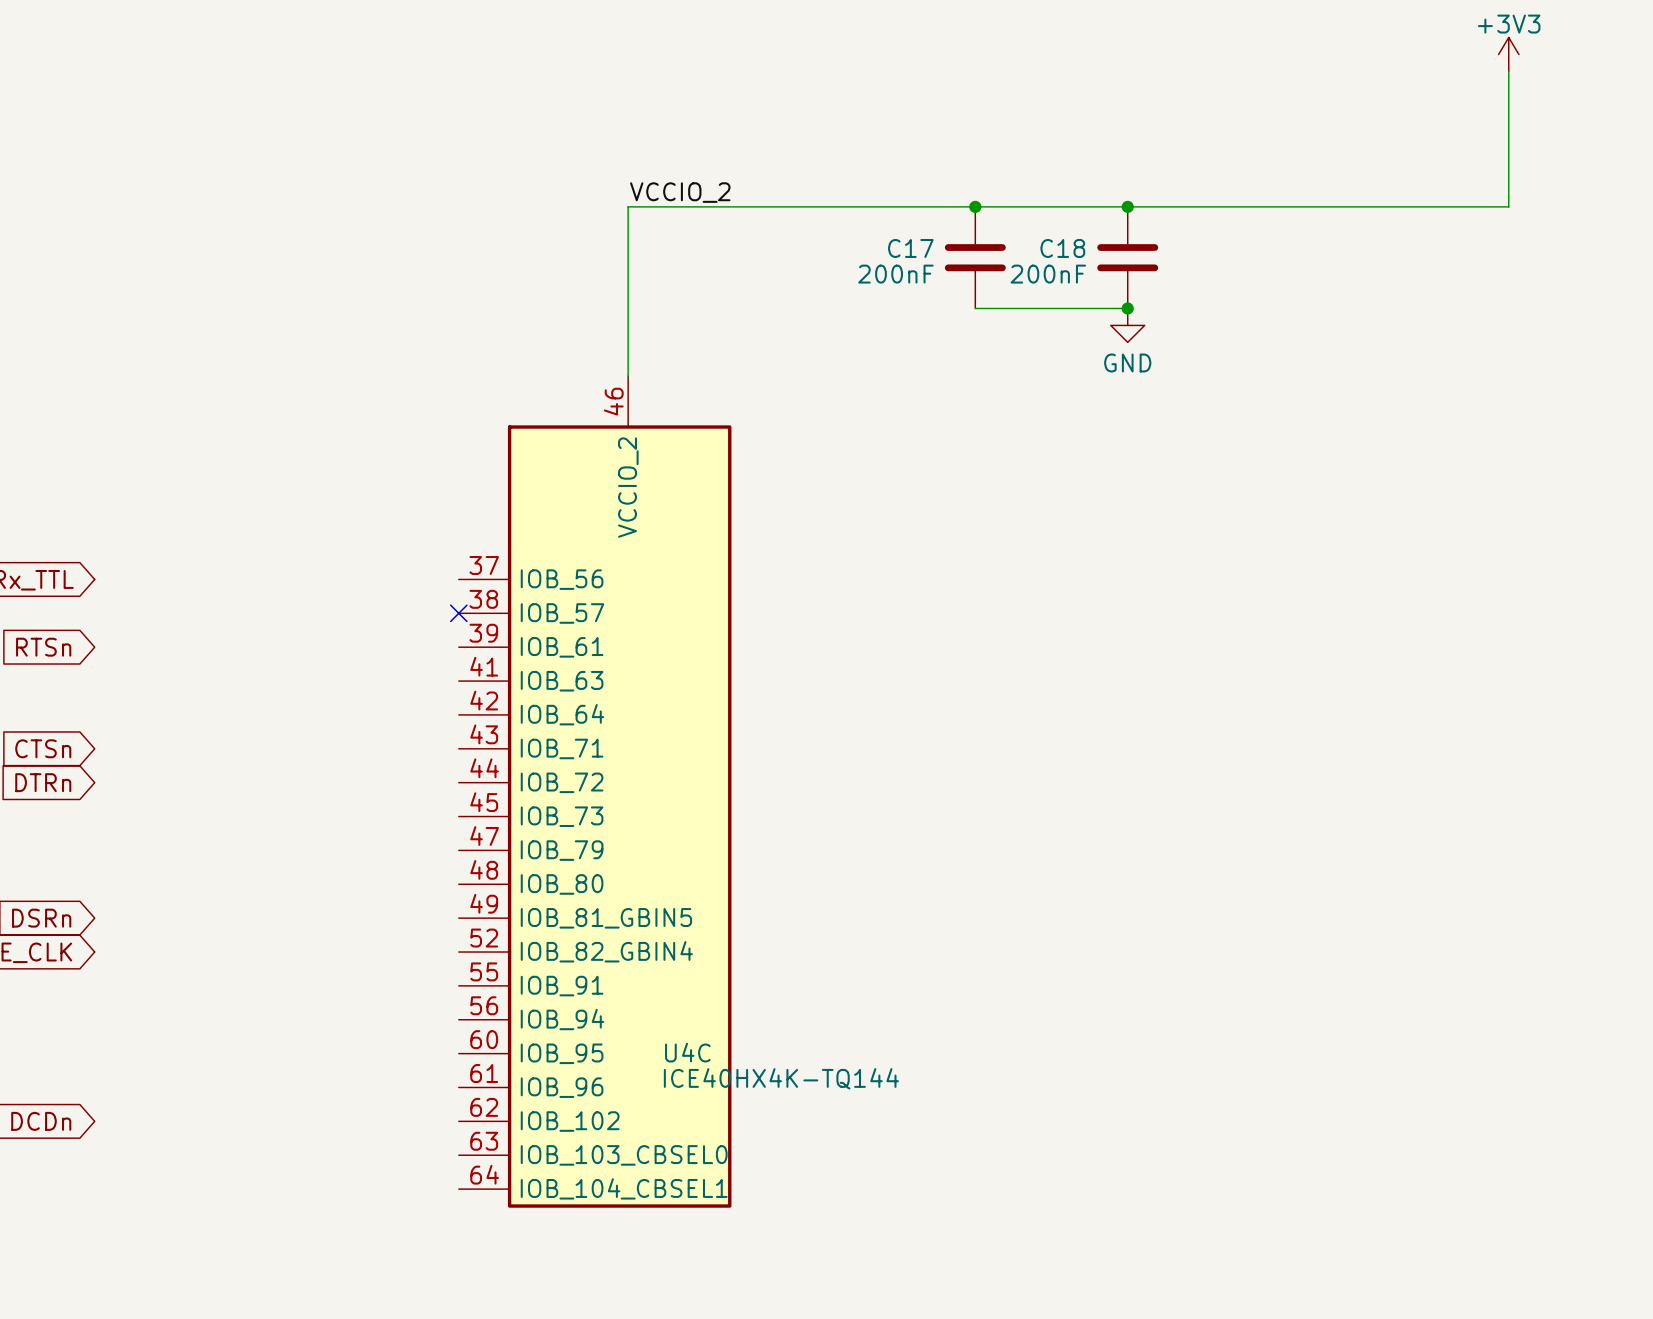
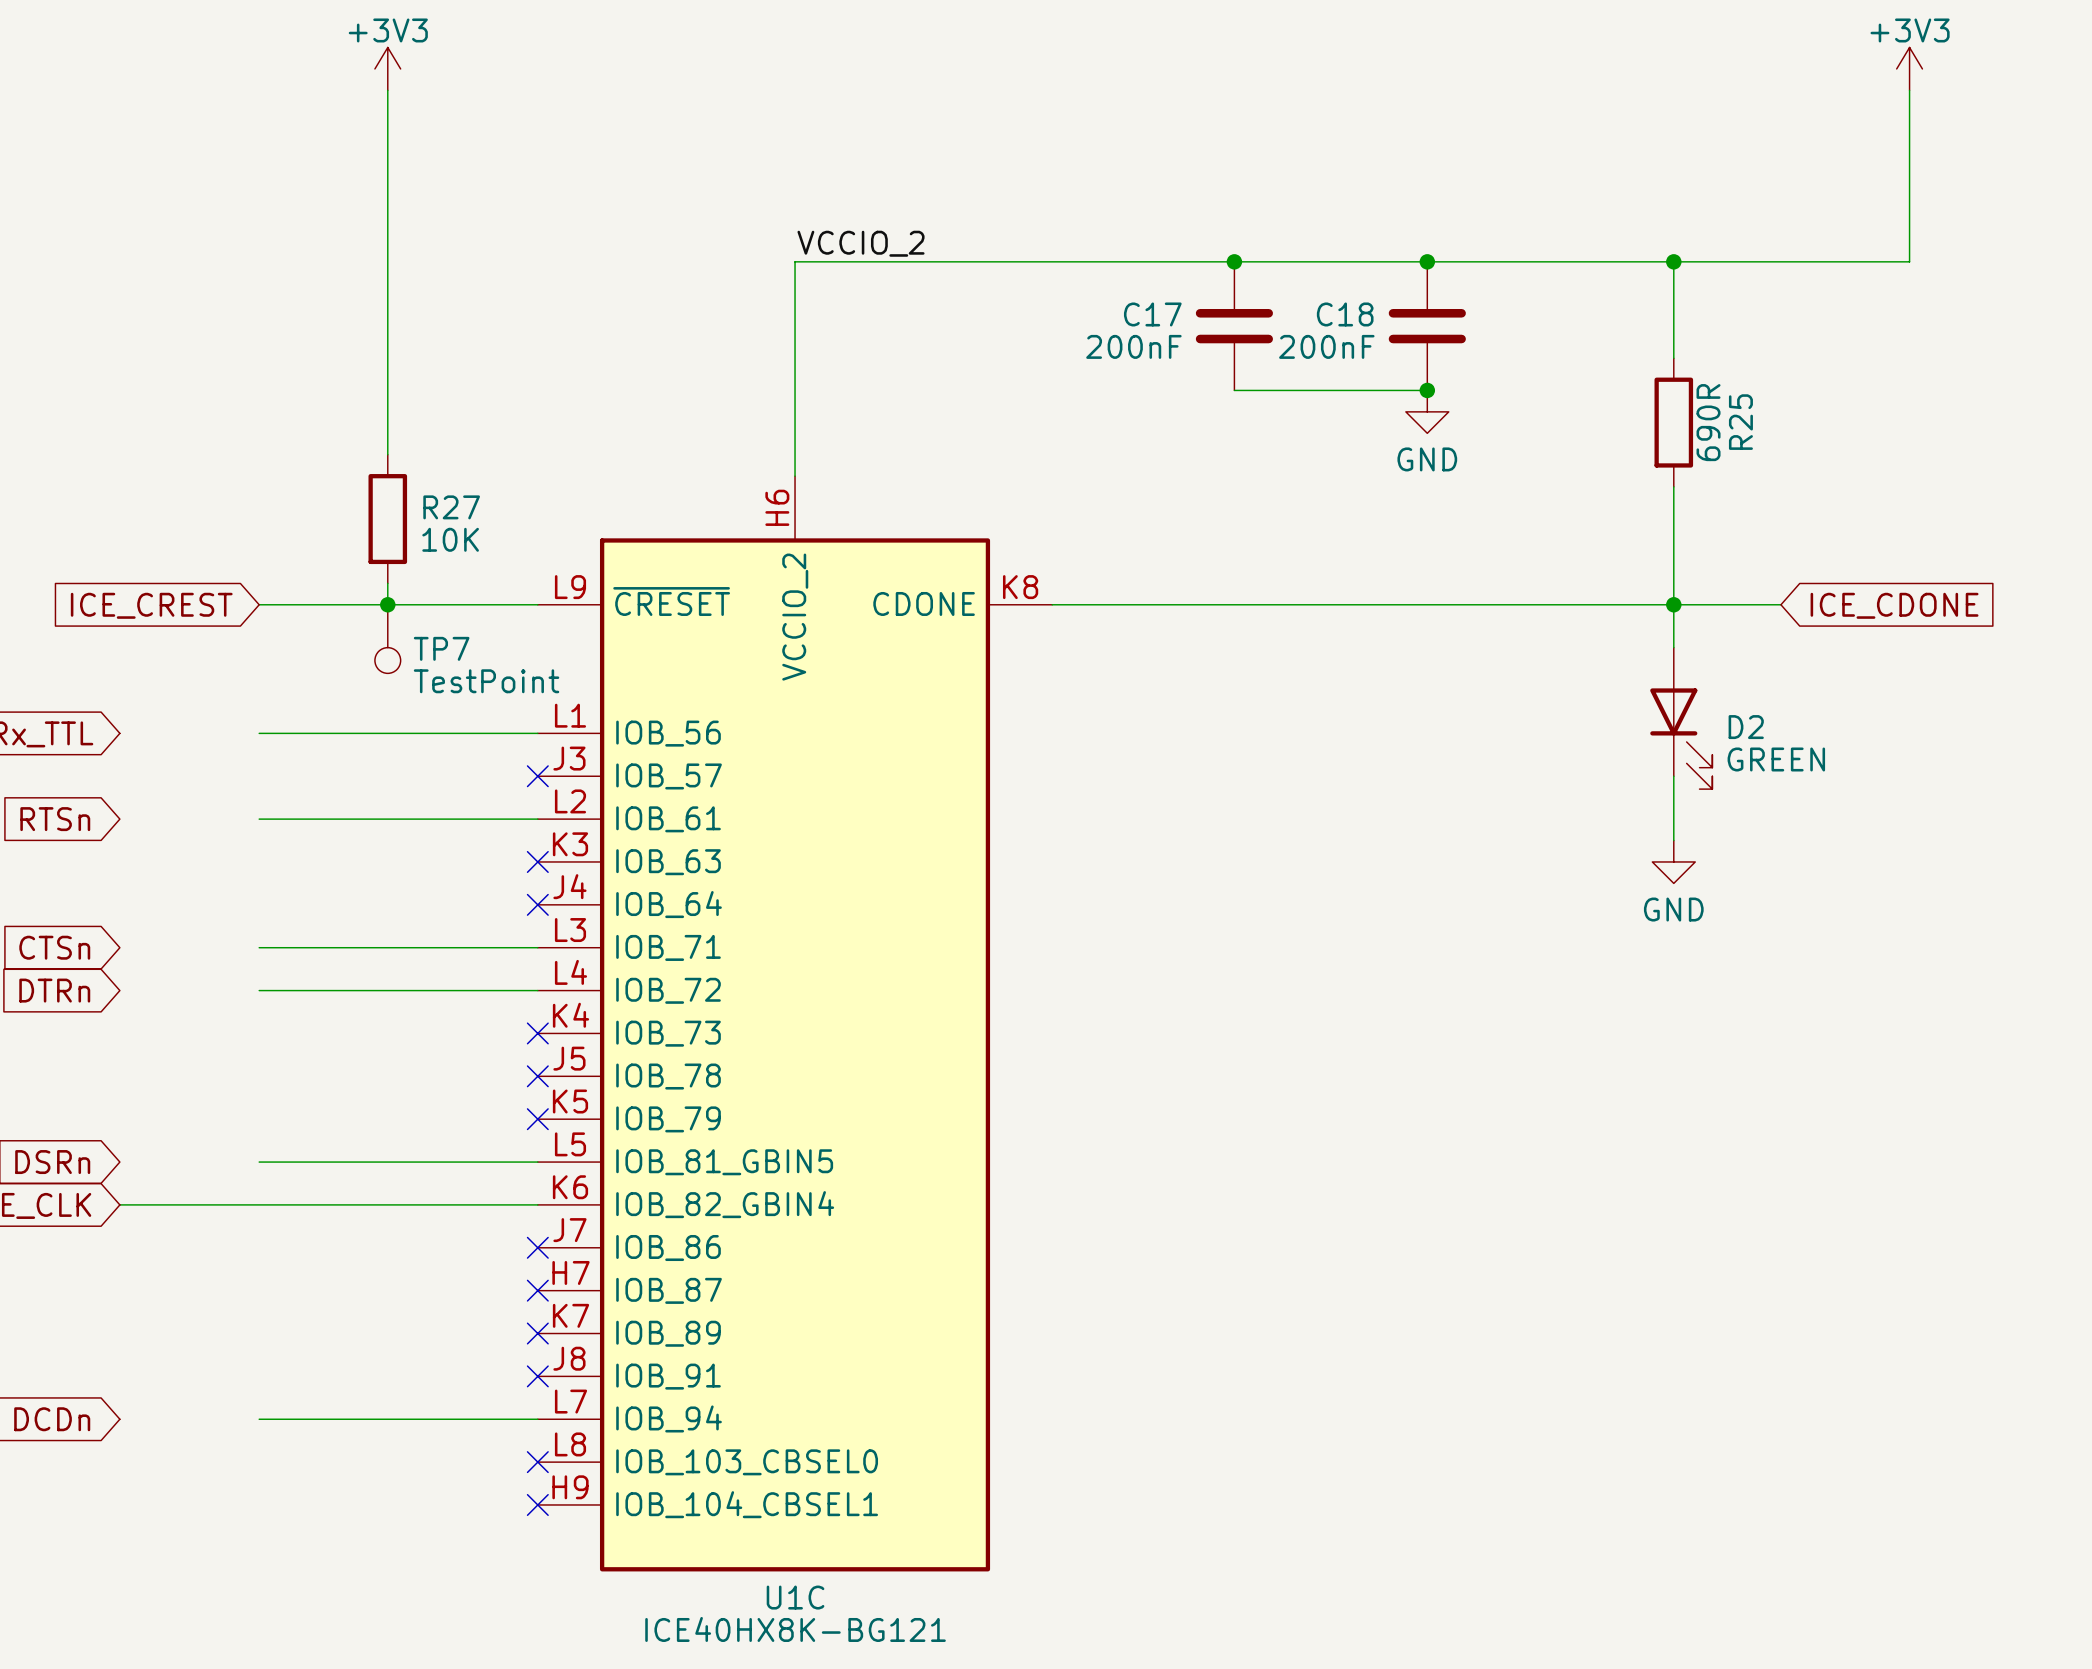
power symbol: none -> +3V3 (387, 68)
wire: none -> (387, 90) (387, 454)
wire: none -> (1673, 261) (1673, 358)
junction: none -> (1673, 261)
R25: none -> 690R (1673, 422)
wire: none -> (1673, 486) (1673, 647)
R27: none -> 10K (387, 519)
wire: none -> (387, 583) (387, 604)
wire: none -> (259, 604) (537, 604)
junction: none -> (387, 604)
wire: none -> (1052, 604) (1780, 604)
junction: none -> (1673, 604)
global label: none -> ICE_CREST (151, 605)
global label: none -> ICE_CDONE (1894, 605)
TP7: none -> TestPoint (387, 639)
D2: none -> GREEN (1681, 718)
wire: none -> (259, 733) (537, 733)
no-connect mark position: (458, 613) -> (537, 776)
wire: none -> (1673, 776) (1673, 840)
wire: none -> (259, 819) (537, 819)
no-connect mark: none -> (537, 861)
power symbol: none -> GND (1673, 861)
no-connect mark: none -> (537, 904)
wire: none -> (259, 947) (537, 947)
wire: none -> (259, 990) (537, 990)
U4C: ICE40HX4K-TQ144 (595, 791) -> none
U1C: none -> ICE40HX8K-BG121 (795, 1023)
no-connect mark: none -> (537, 1033)
no-connect mark: none -> (537, 1076)
no-connect mark: none -> (537, 1119)
wire: none -> (259, 1162) (537, 1162)
wire: none -> (119, 1204) (537, 1204)
no-connect mark: none -> (537, 1247)
no-connect mark: none -> (537, 1290)
no-connect mark: none -> (537, 1333)
no-connect mark: none -> (537, 1376)
wire: none -> (259, 1419) (537, 1419)
no-connect mark: none -> (537, 1462)
no-connect mark: none -> (537, 1504)

